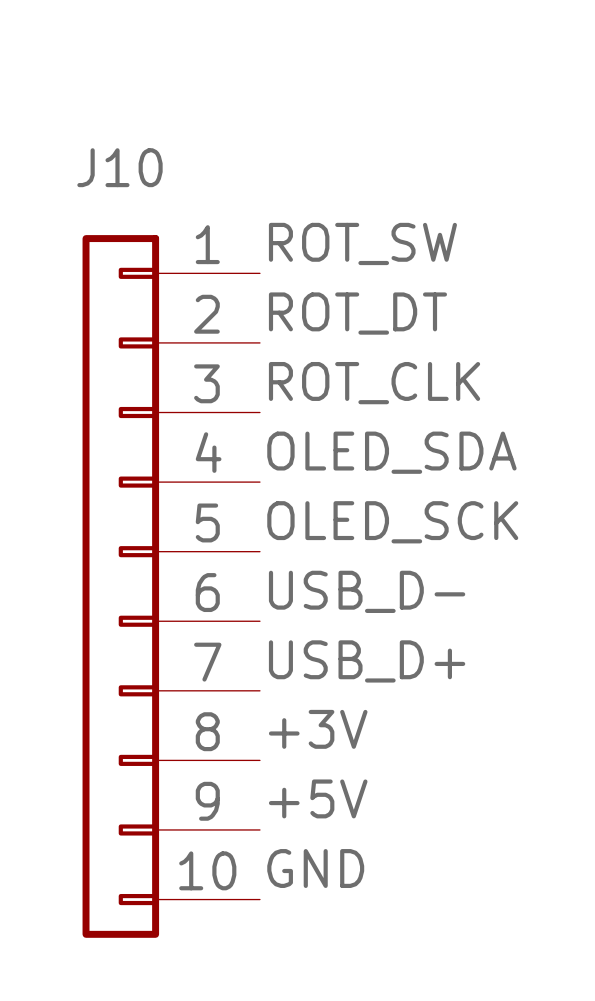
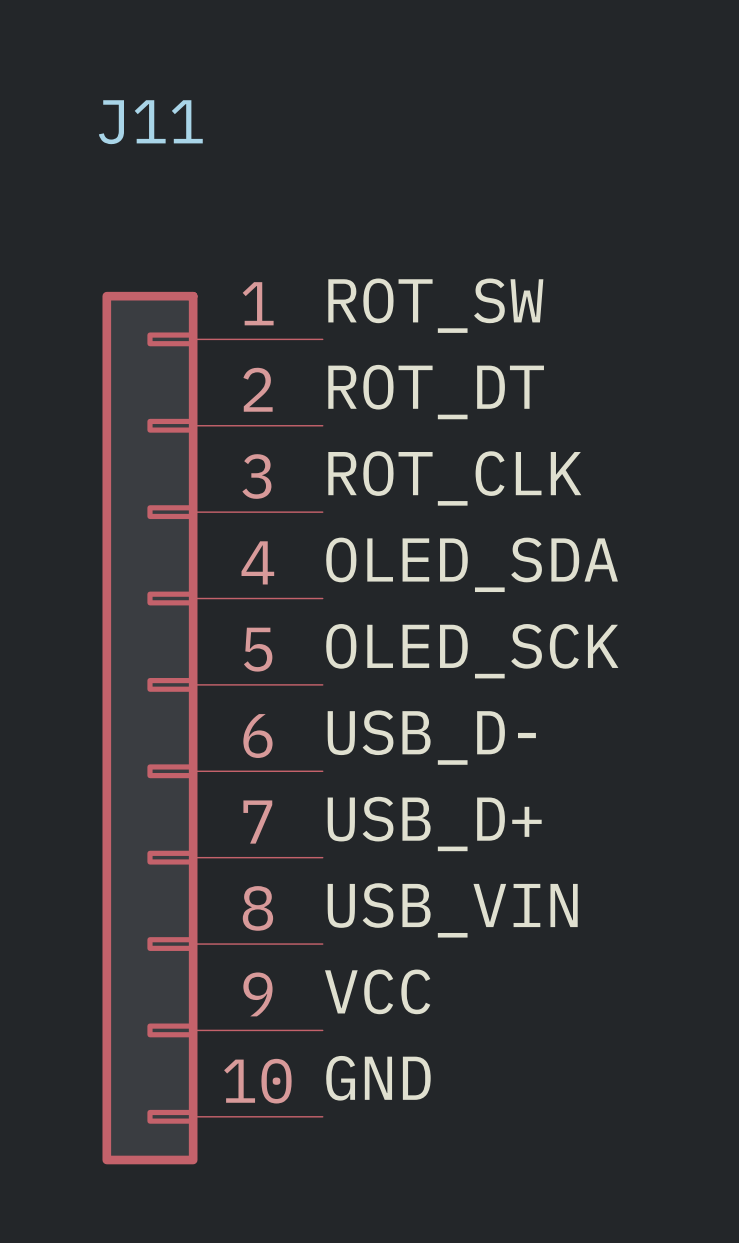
J10 name: J10 (119, 167) -> J11 (150, 122)
label: +3V (318, 729) -> USB_VIN (452, 910)
label: +5V (318, 798) -> VCC (377, 991)

